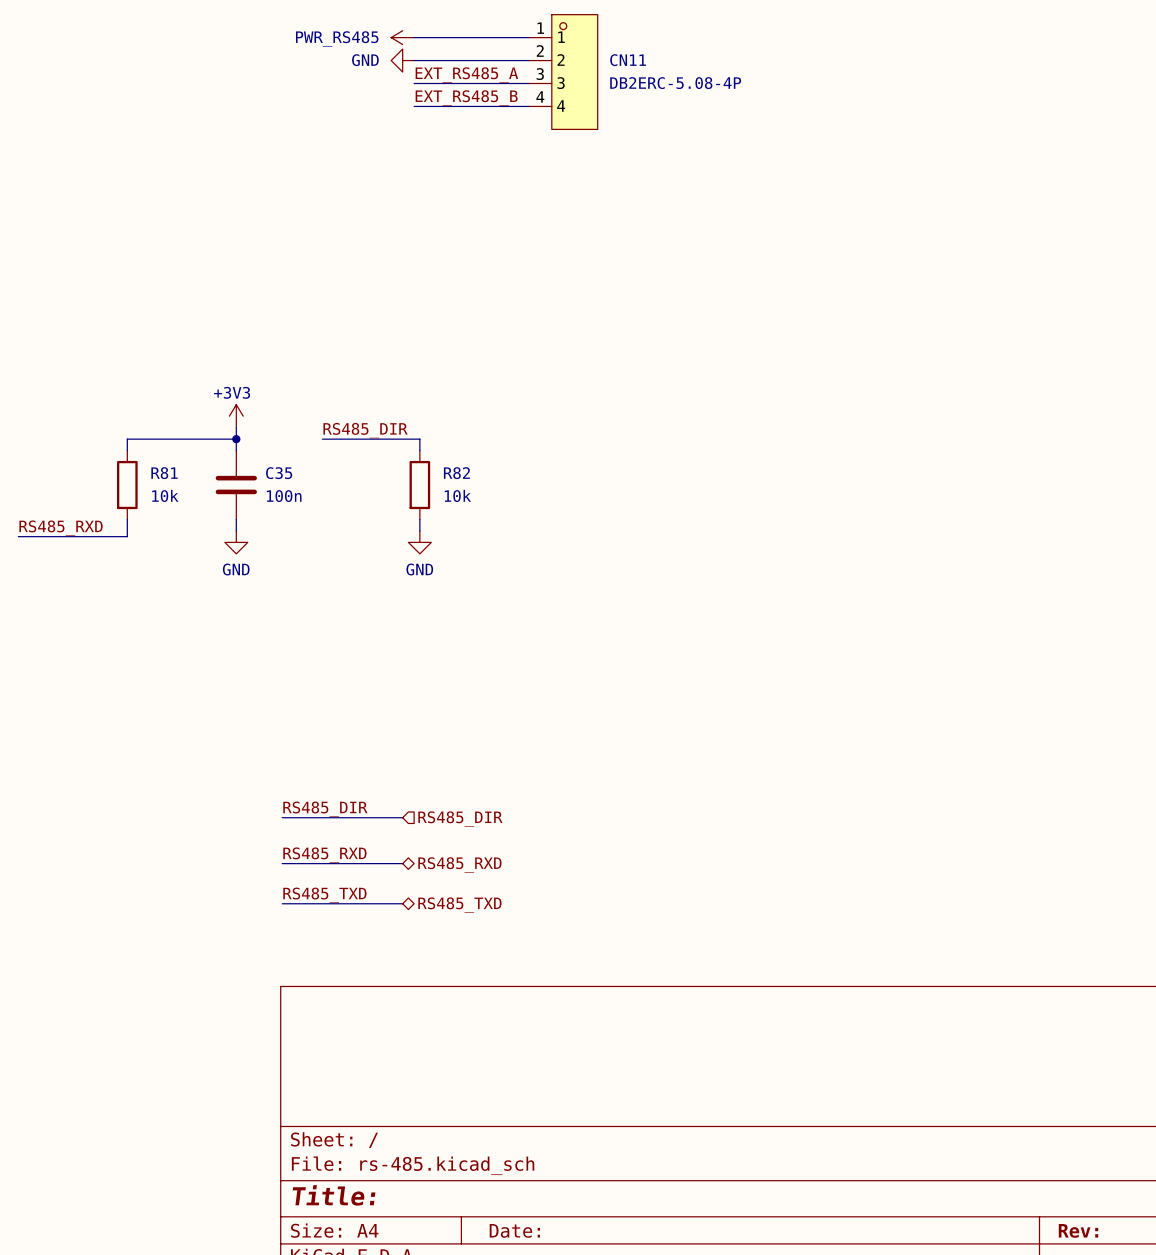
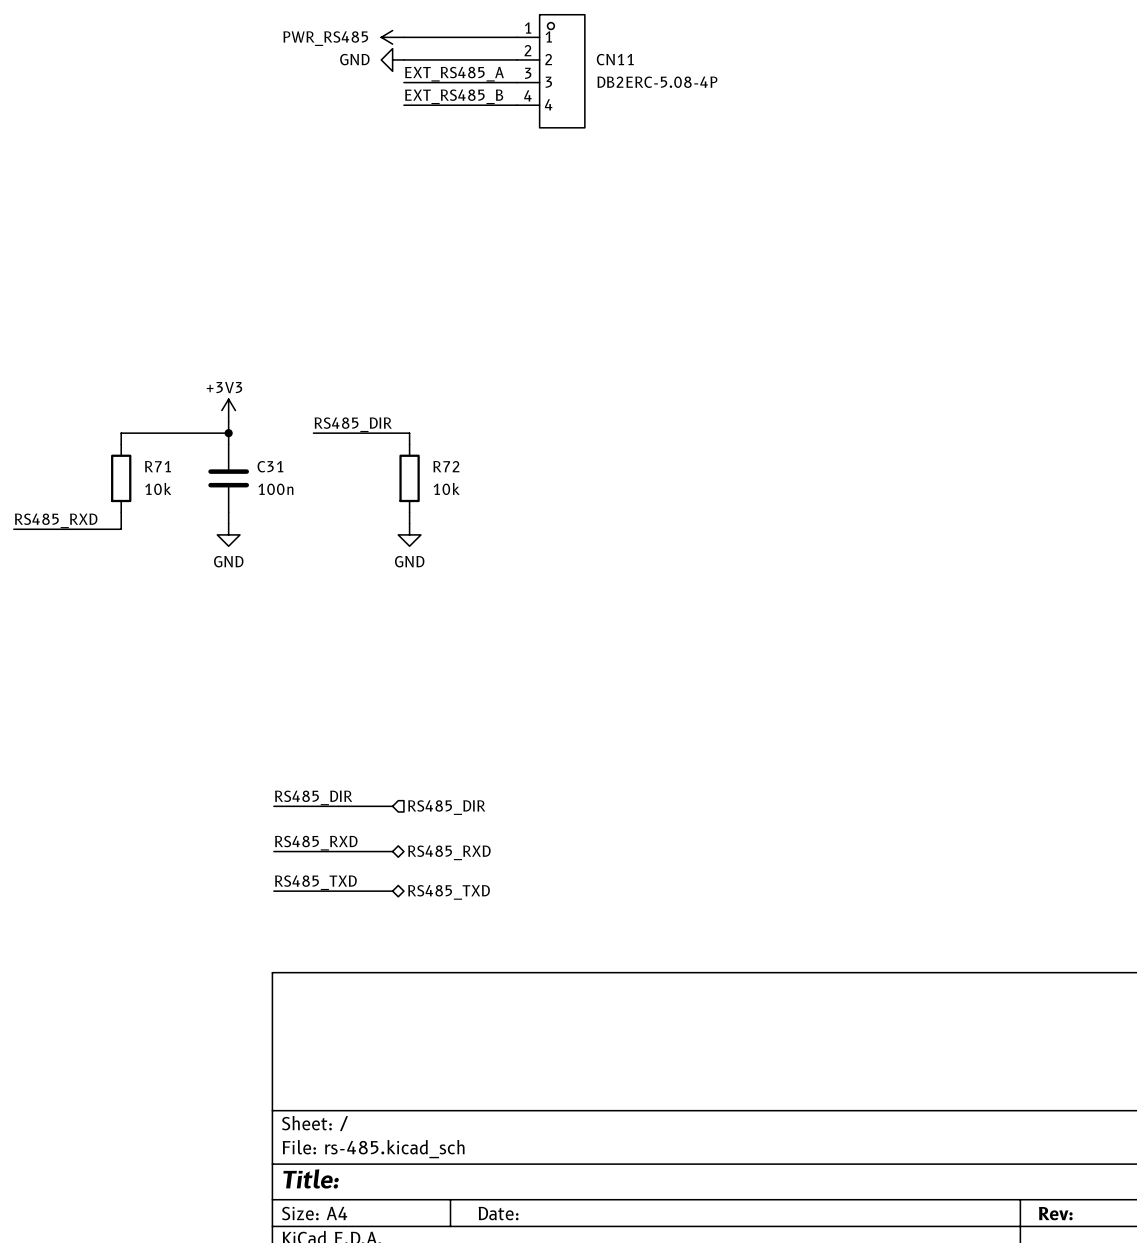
R81 name: R81 (164, 473) -> R71 (157, 466)
C35 name: C35 (279, 473) -> C31 (270, 466)
R82 name: R82 (456, 473) -> R72 (446, 466)

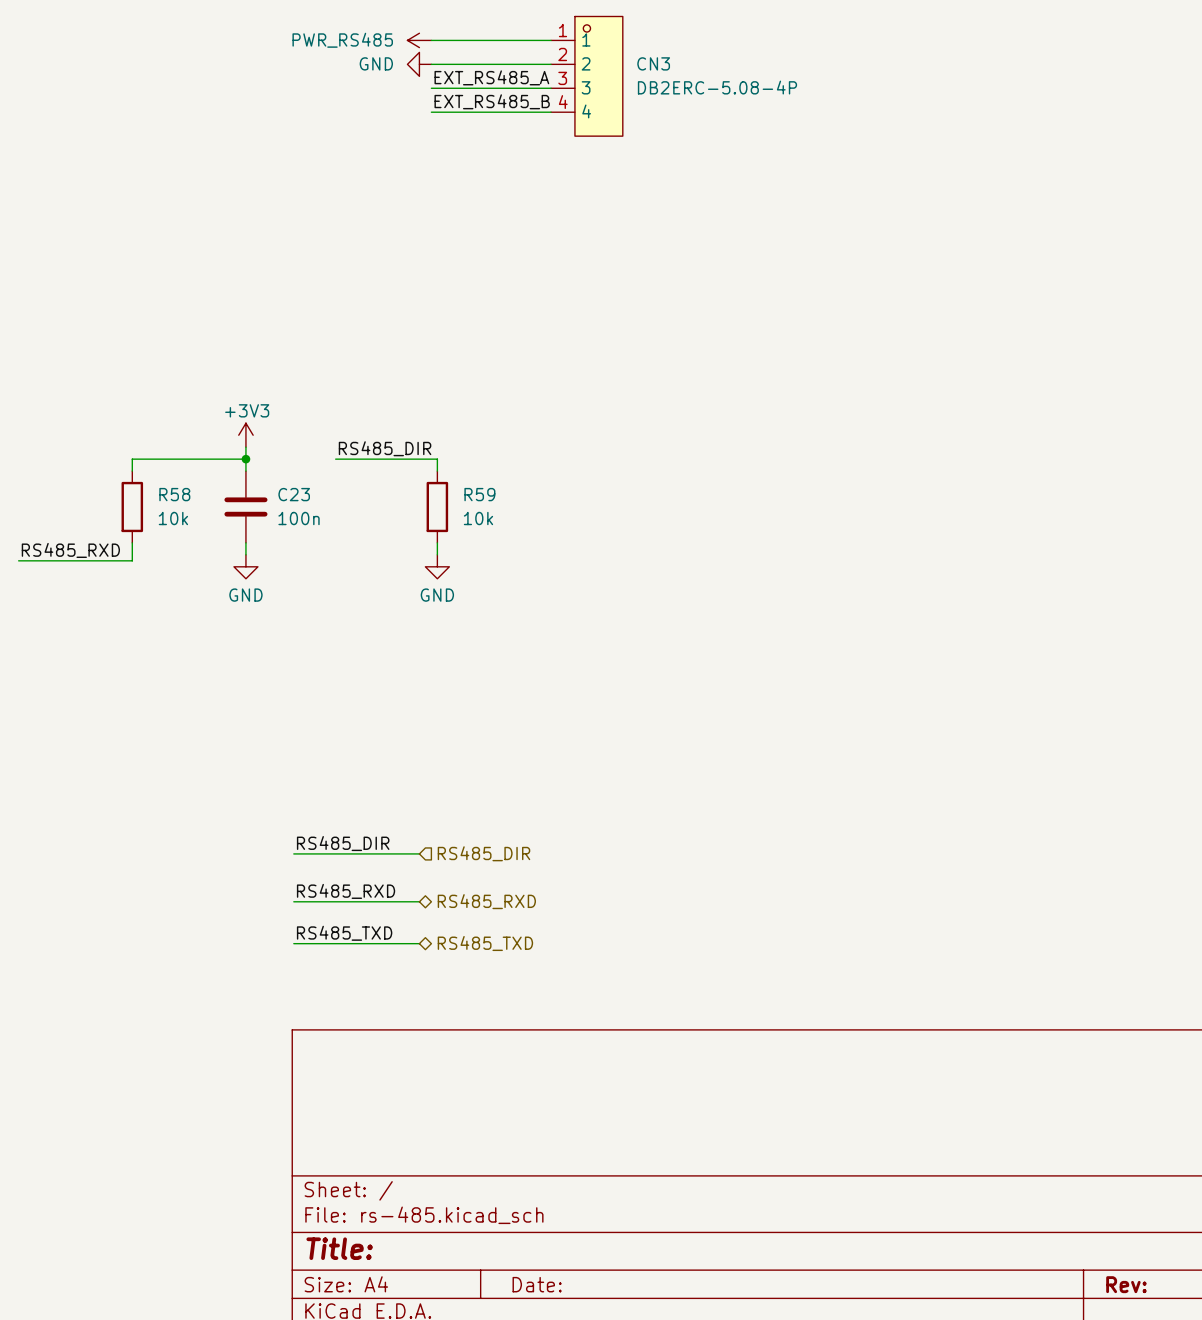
CN11 name: CN11 (615, 59) -> CN3 (653, 63)
R71 name: R71 (157, 466) -> R58 (174, 494)
C31 name: C31 (270, 466) -> C23 (294, 494)
R72 name: R72 (446, 466) -> R59 (479, 494)

